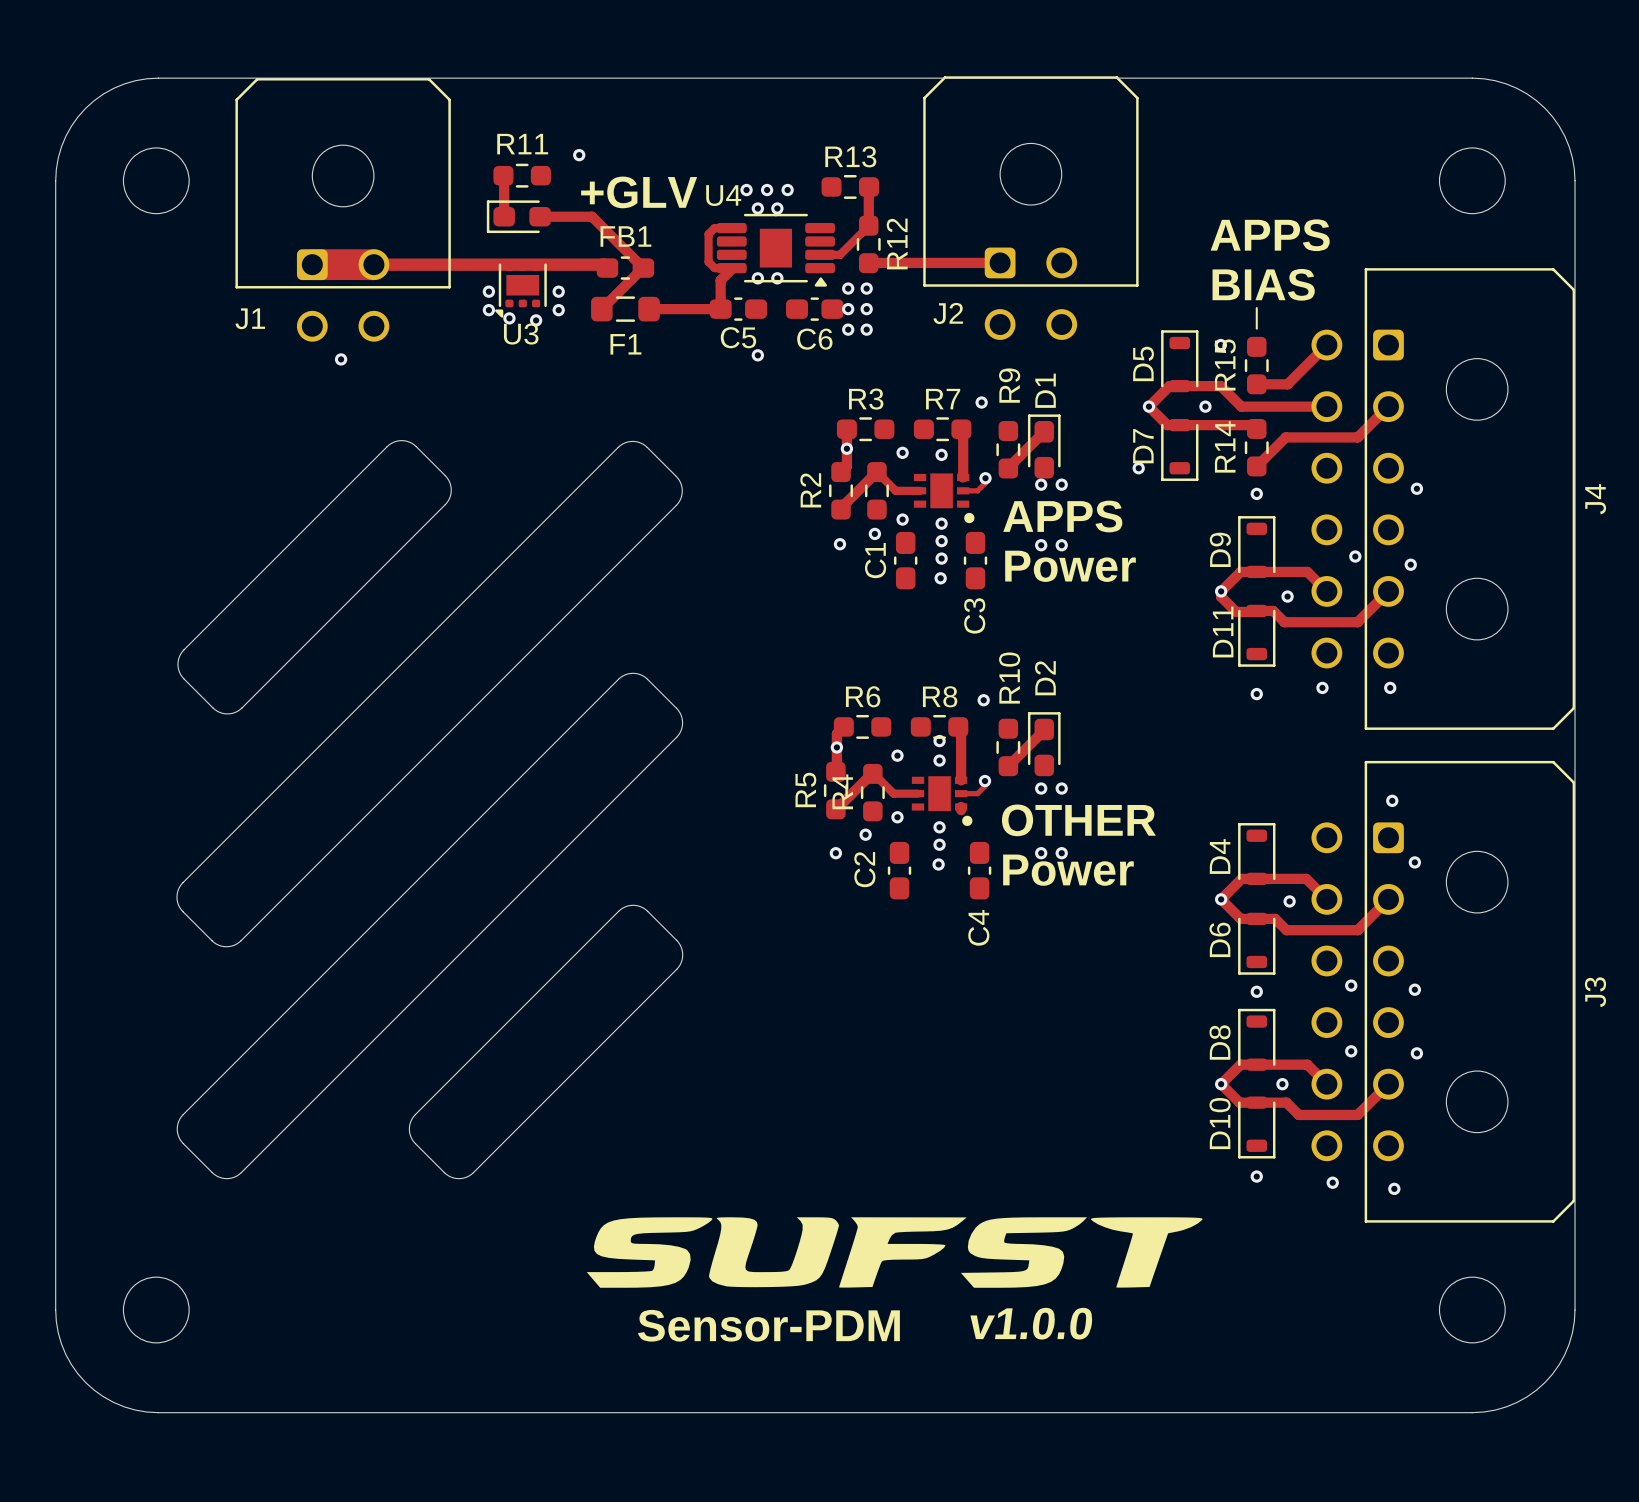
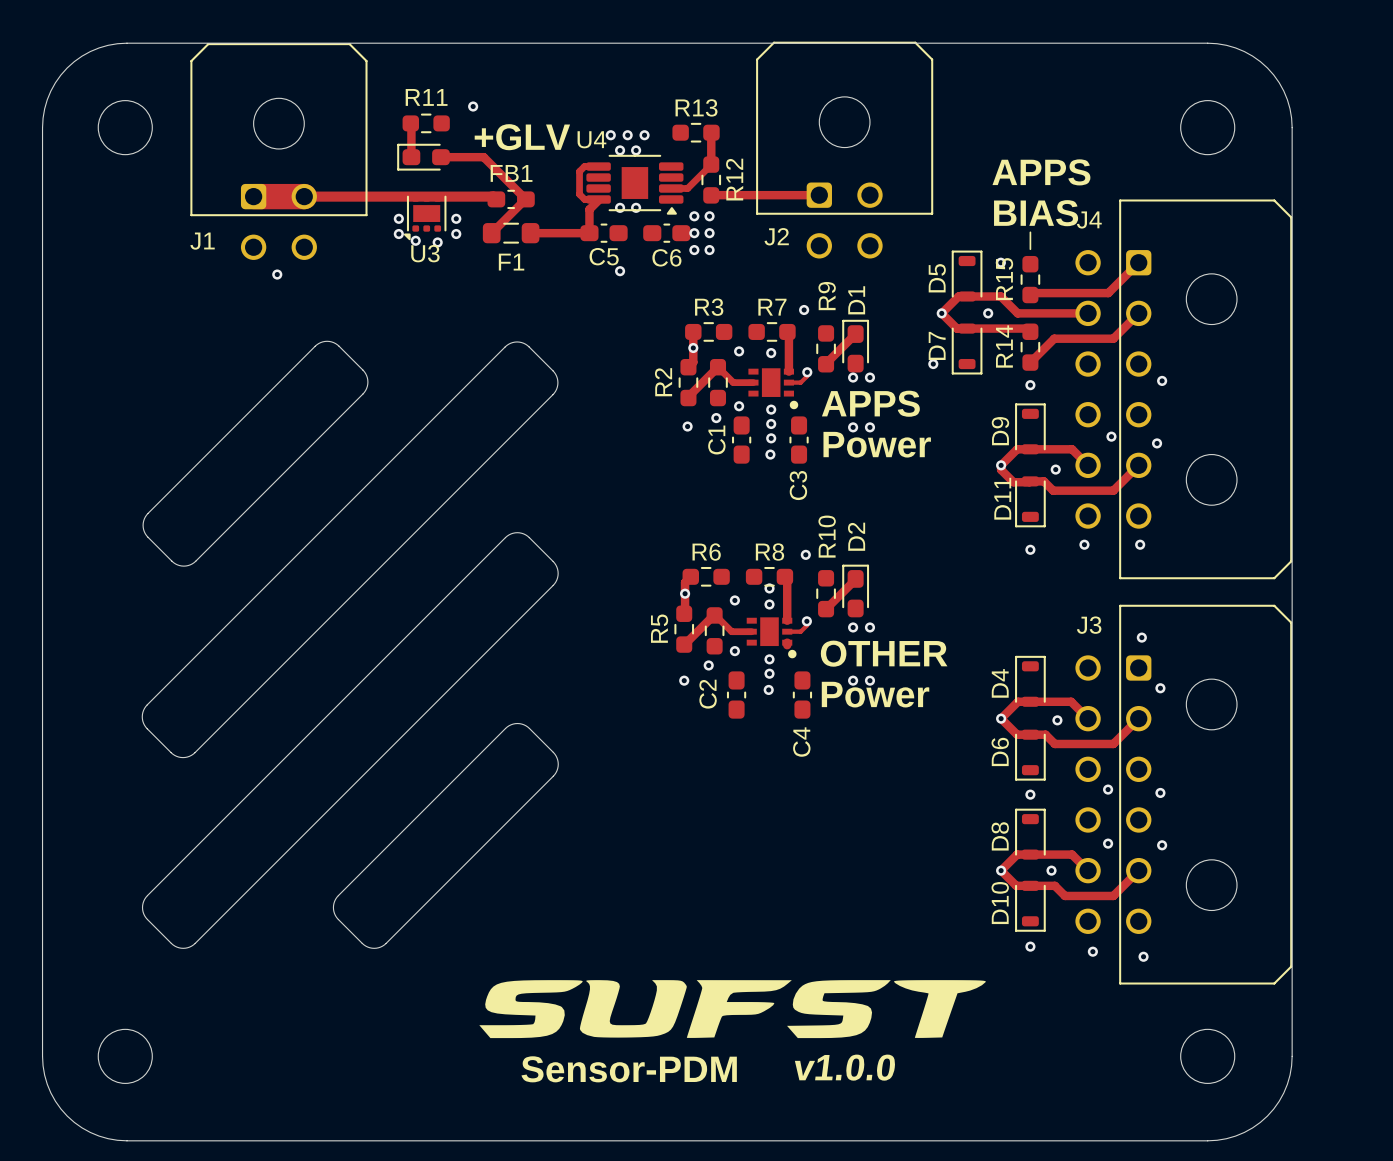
track: (1326, 345) (1287, 384) (1256, 384) -> none
track: none -> (1138, 262) (1108, 293) (1032, 293)
J4 name rotation: 0° (1595, 499) -> 90° clockwise (1089, 219)
J4 name position: J4 (1595, 499) -> J4 (1089, 219)
R4 name: R4 (842, 791) -> none
J3 name rotation: 0° (1595, 992) -> 90° clockwise (1089, 625)
J3 name position: J3 (1595, 992) -> J3 (1089, 625)

